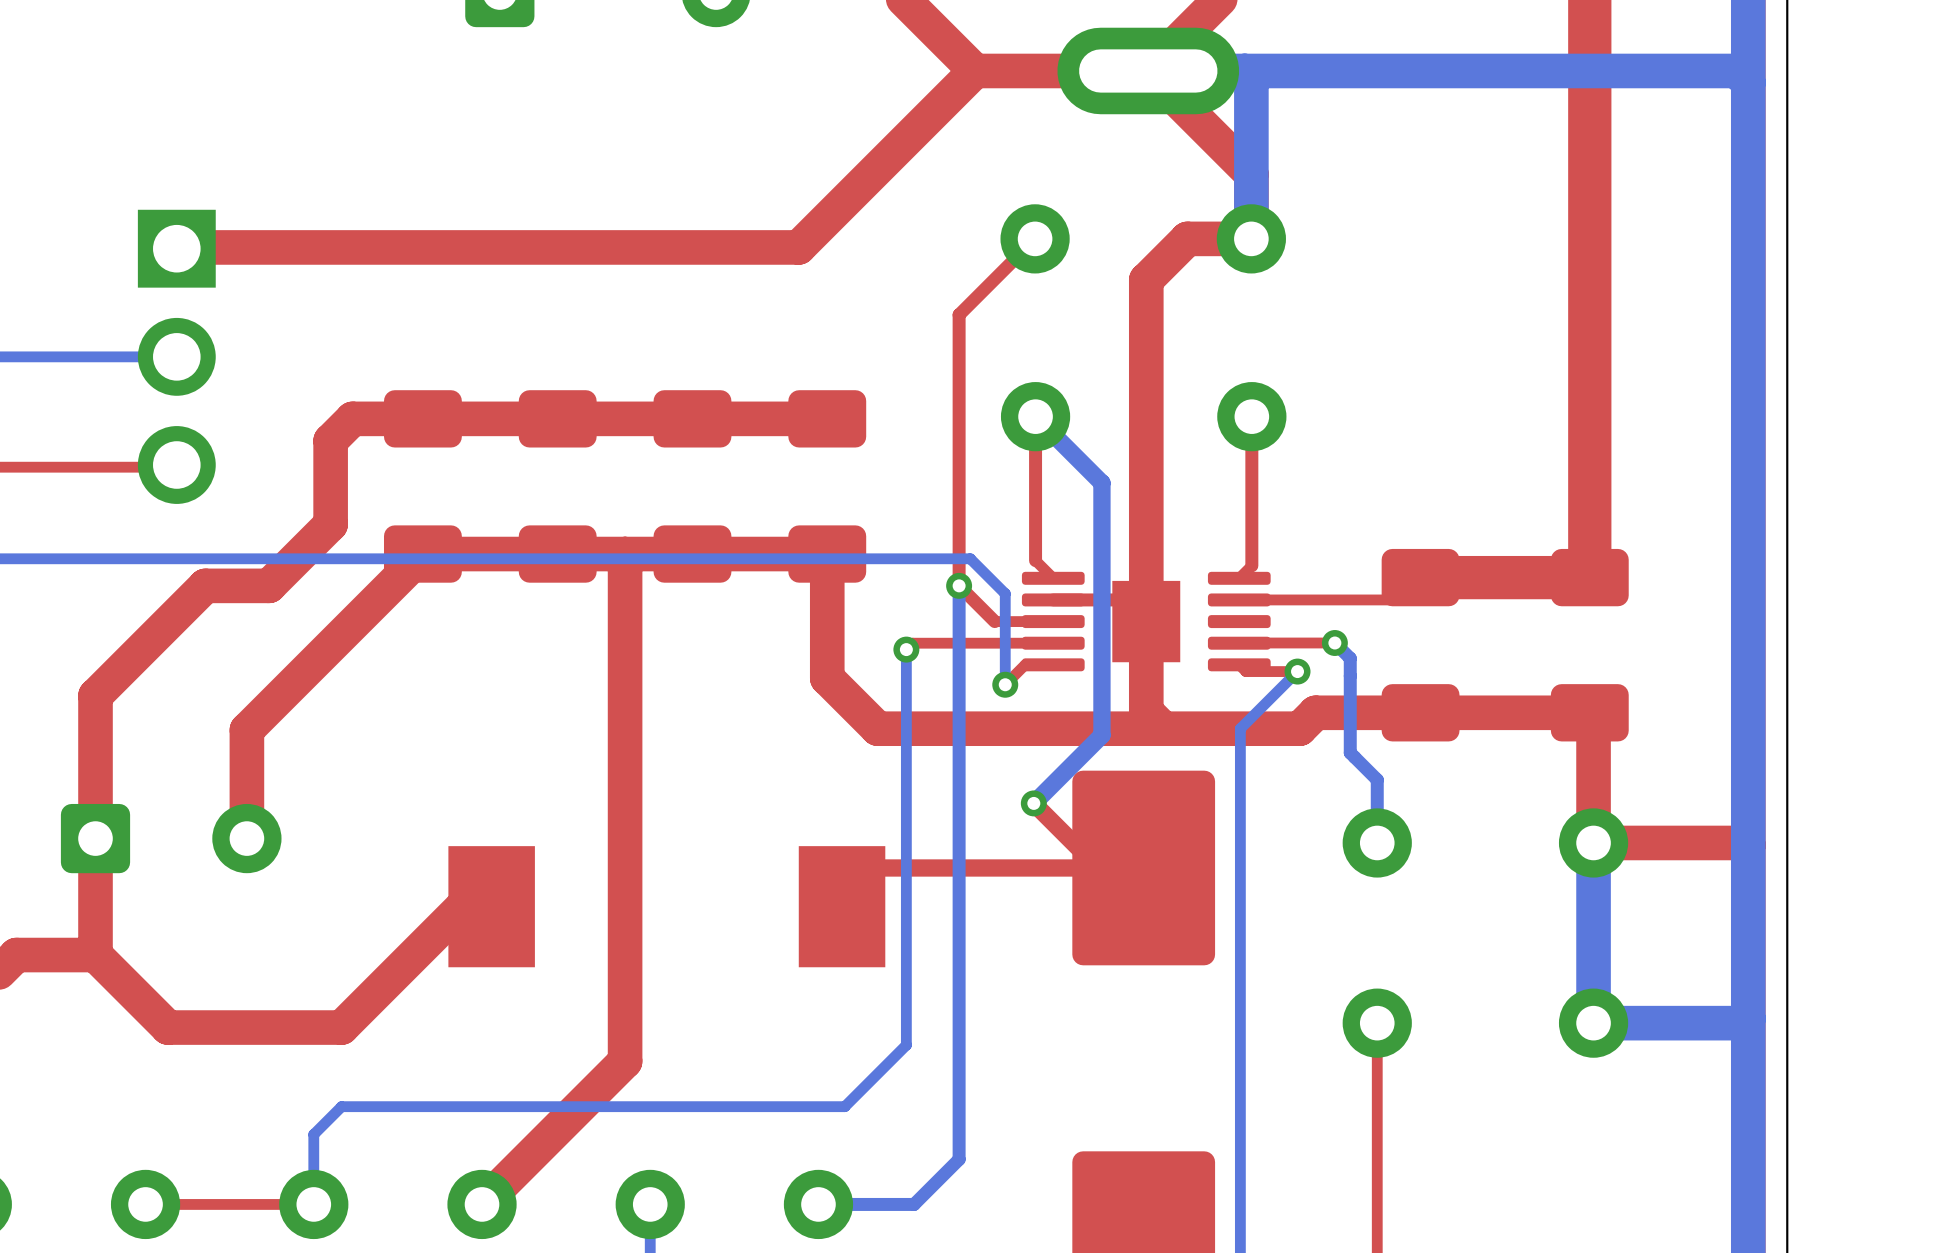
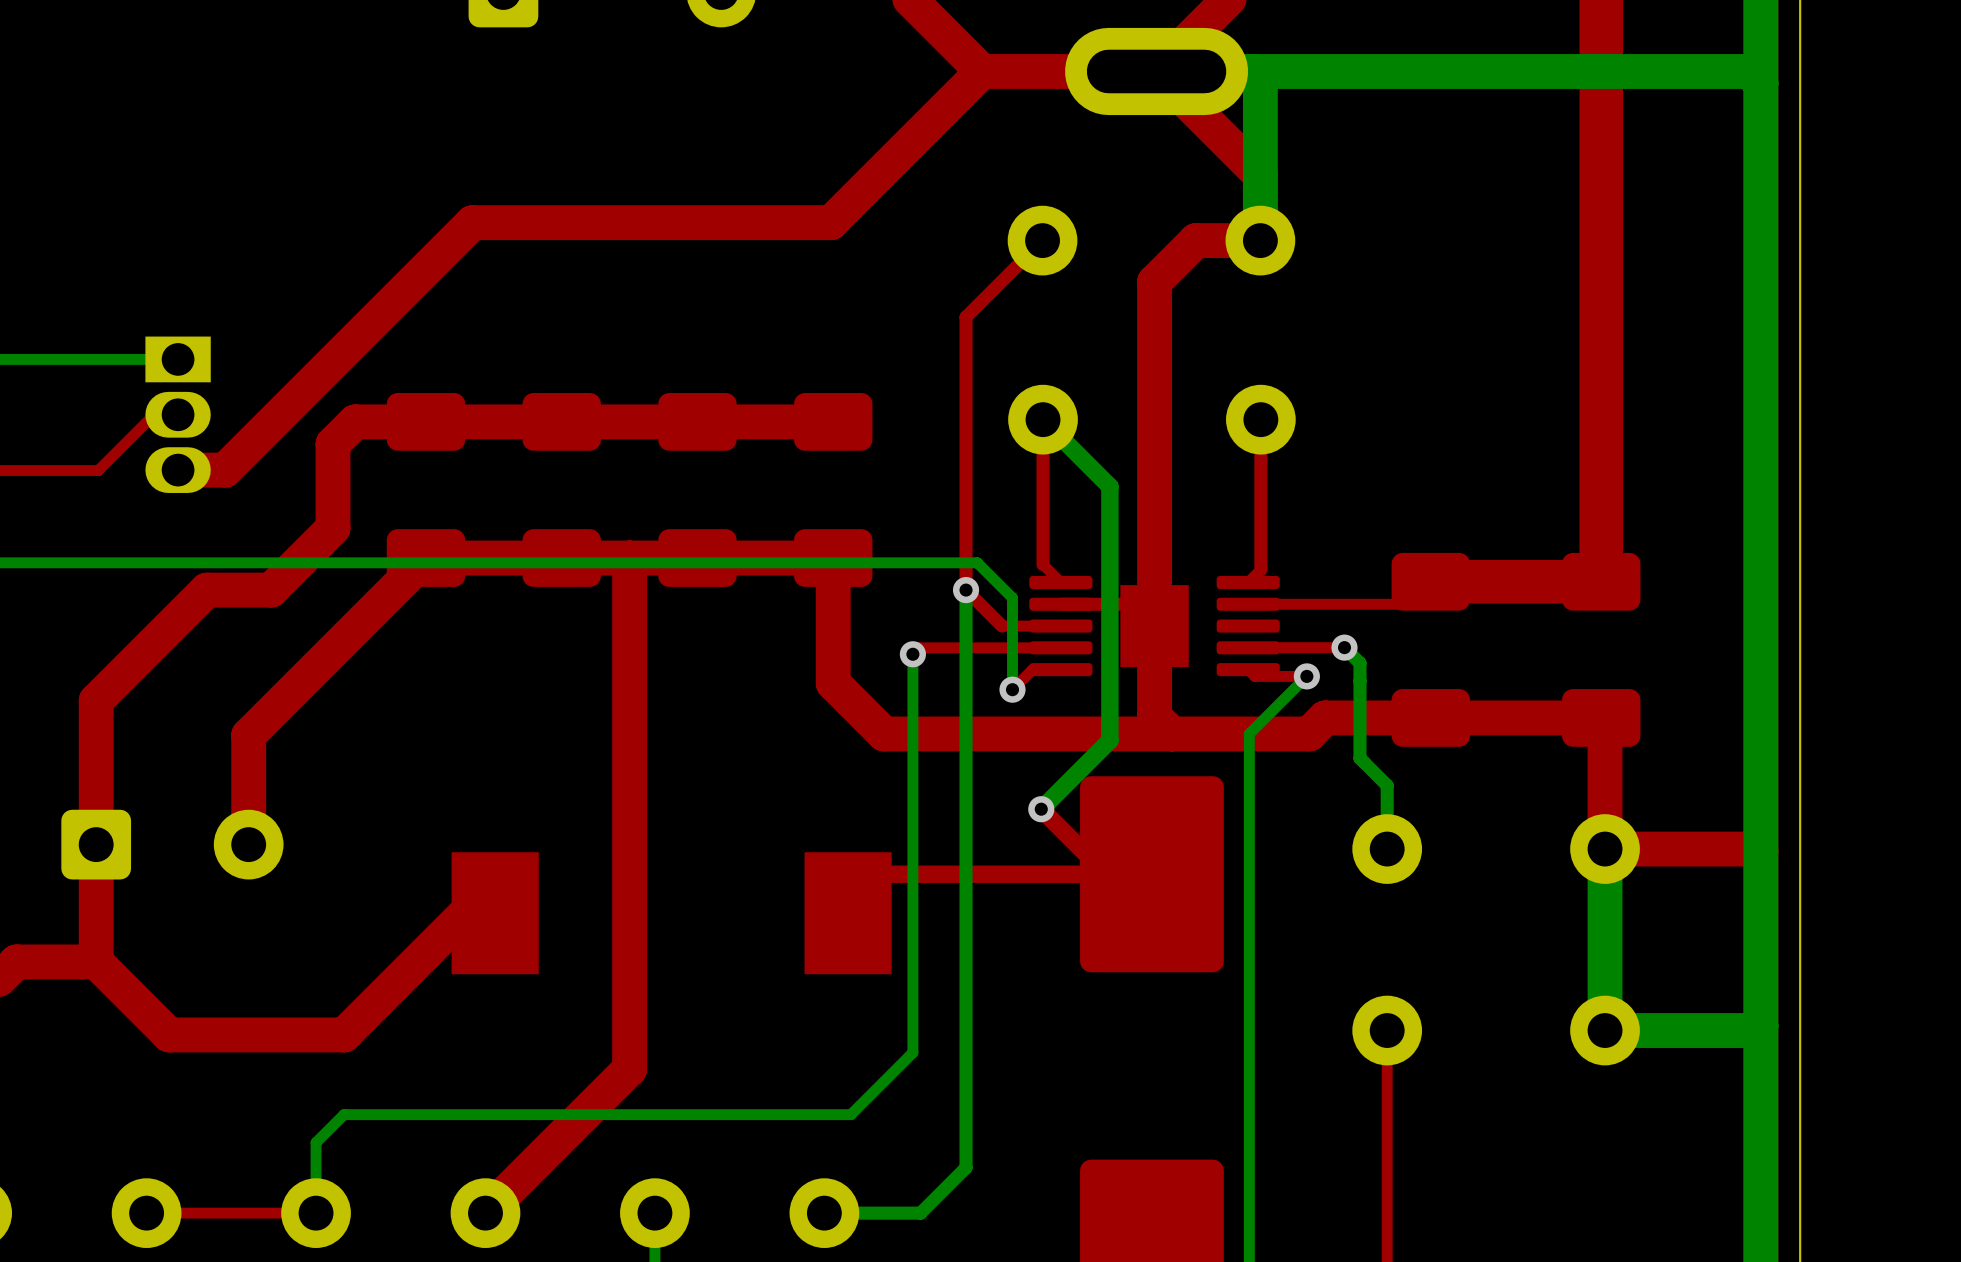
top track: (825, 221) (798, 247) (176, 248) -> (831, 222) (472, 222) (225, 470) (178, 470)
part: (176, 356) -> none
part: none -> (178, 414)
top track: (174, 467) (97, 467) -> (178, 414) (154, 414) (98, 470)

